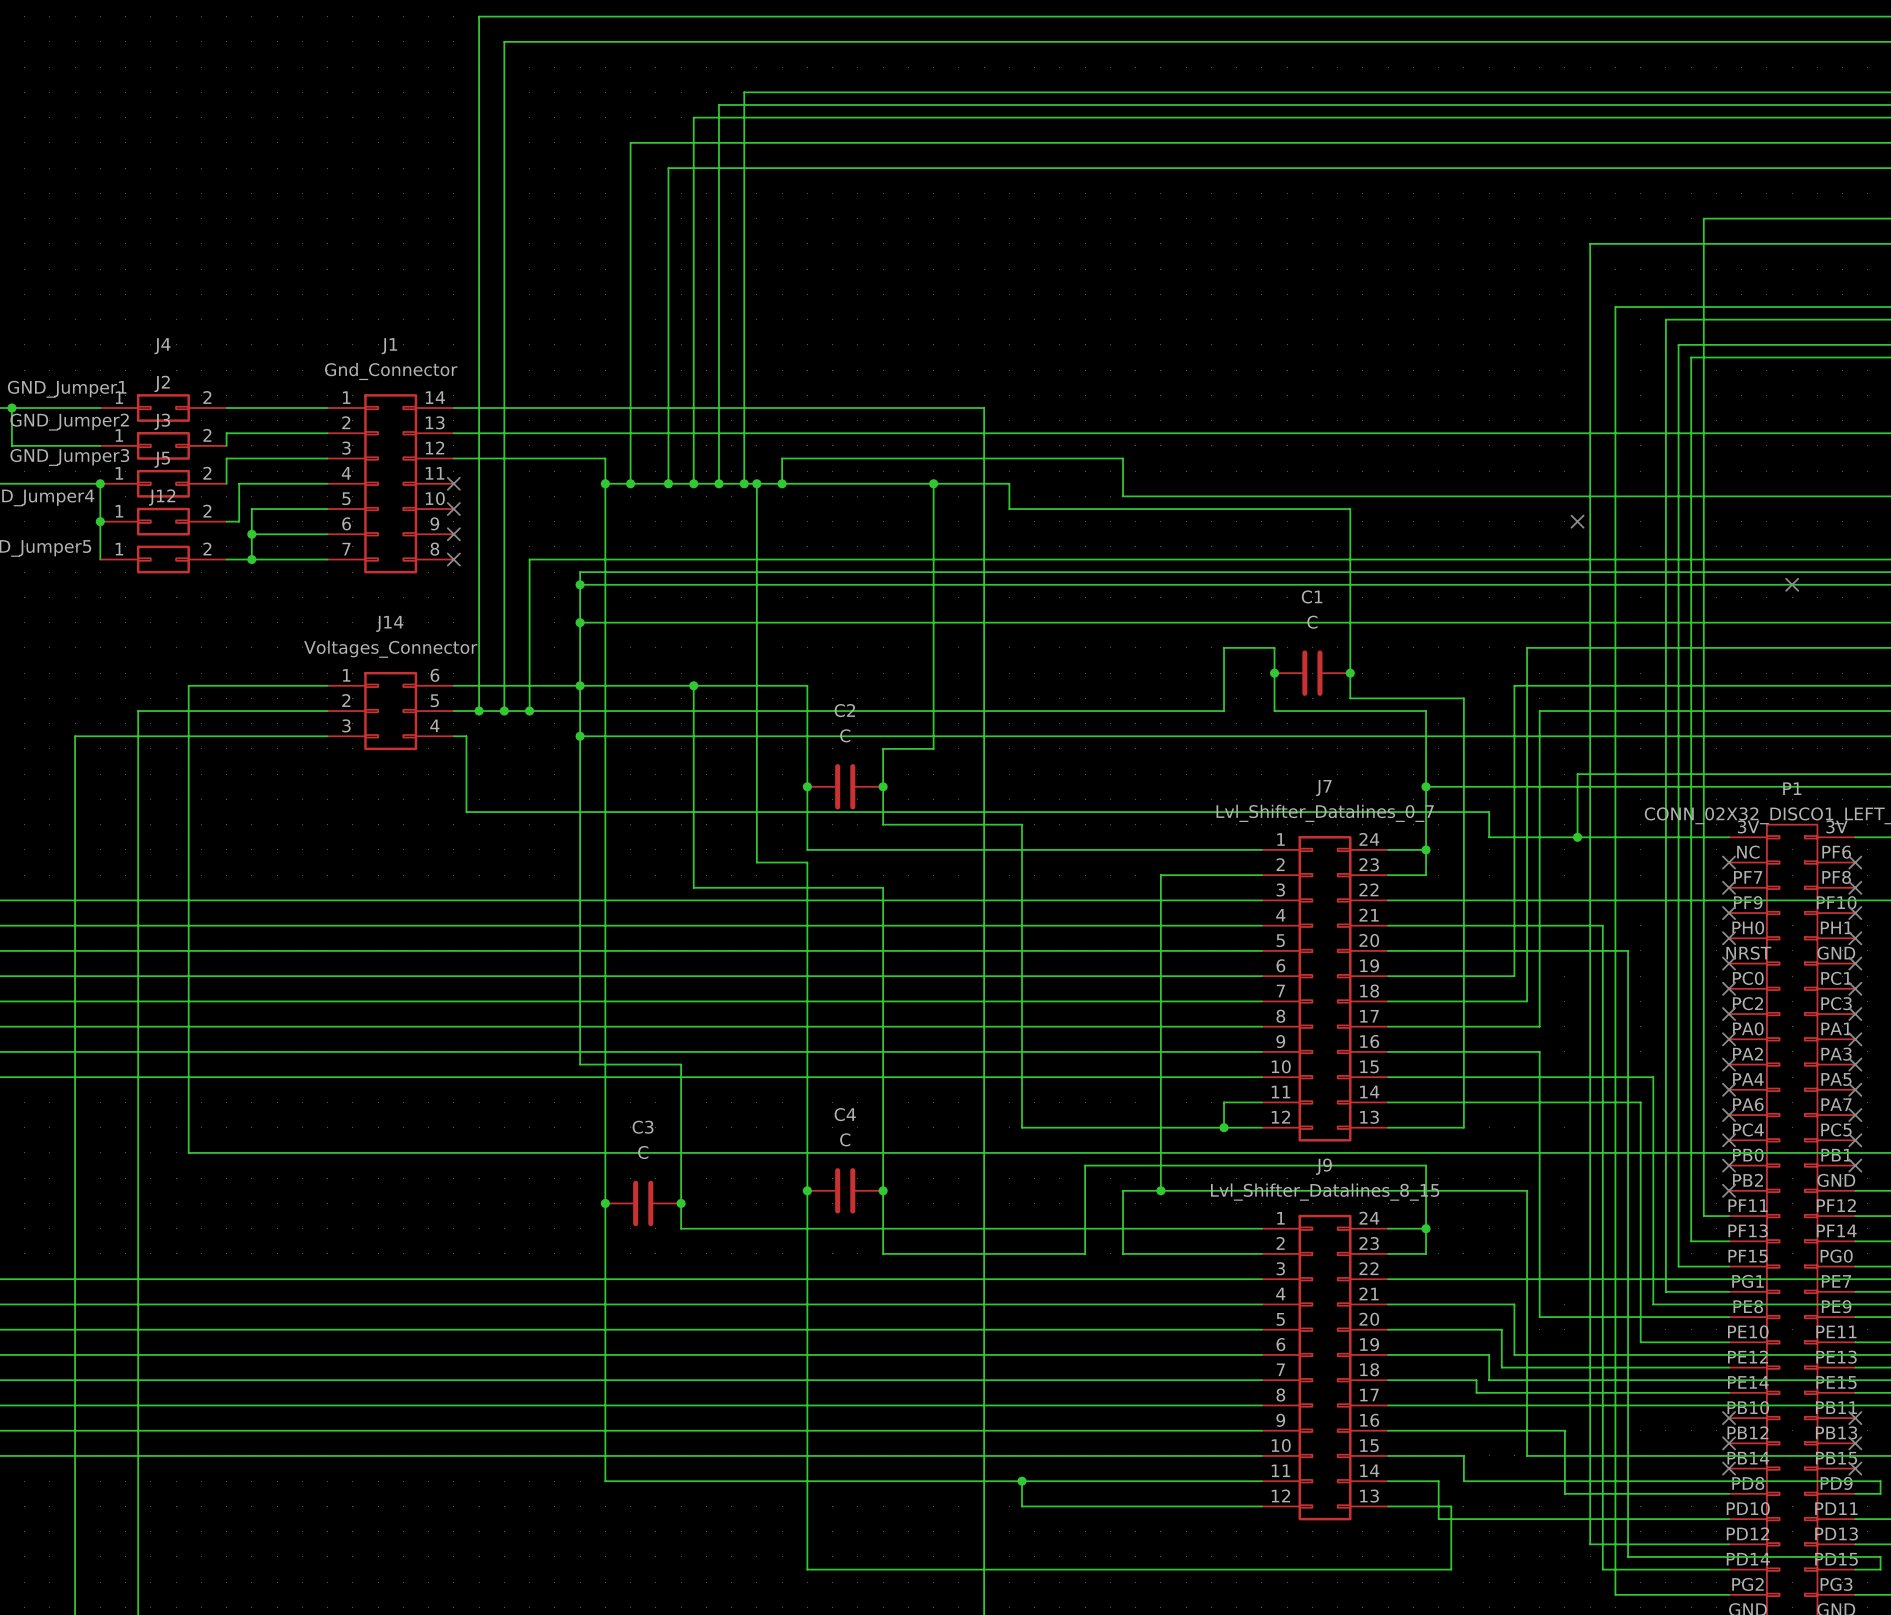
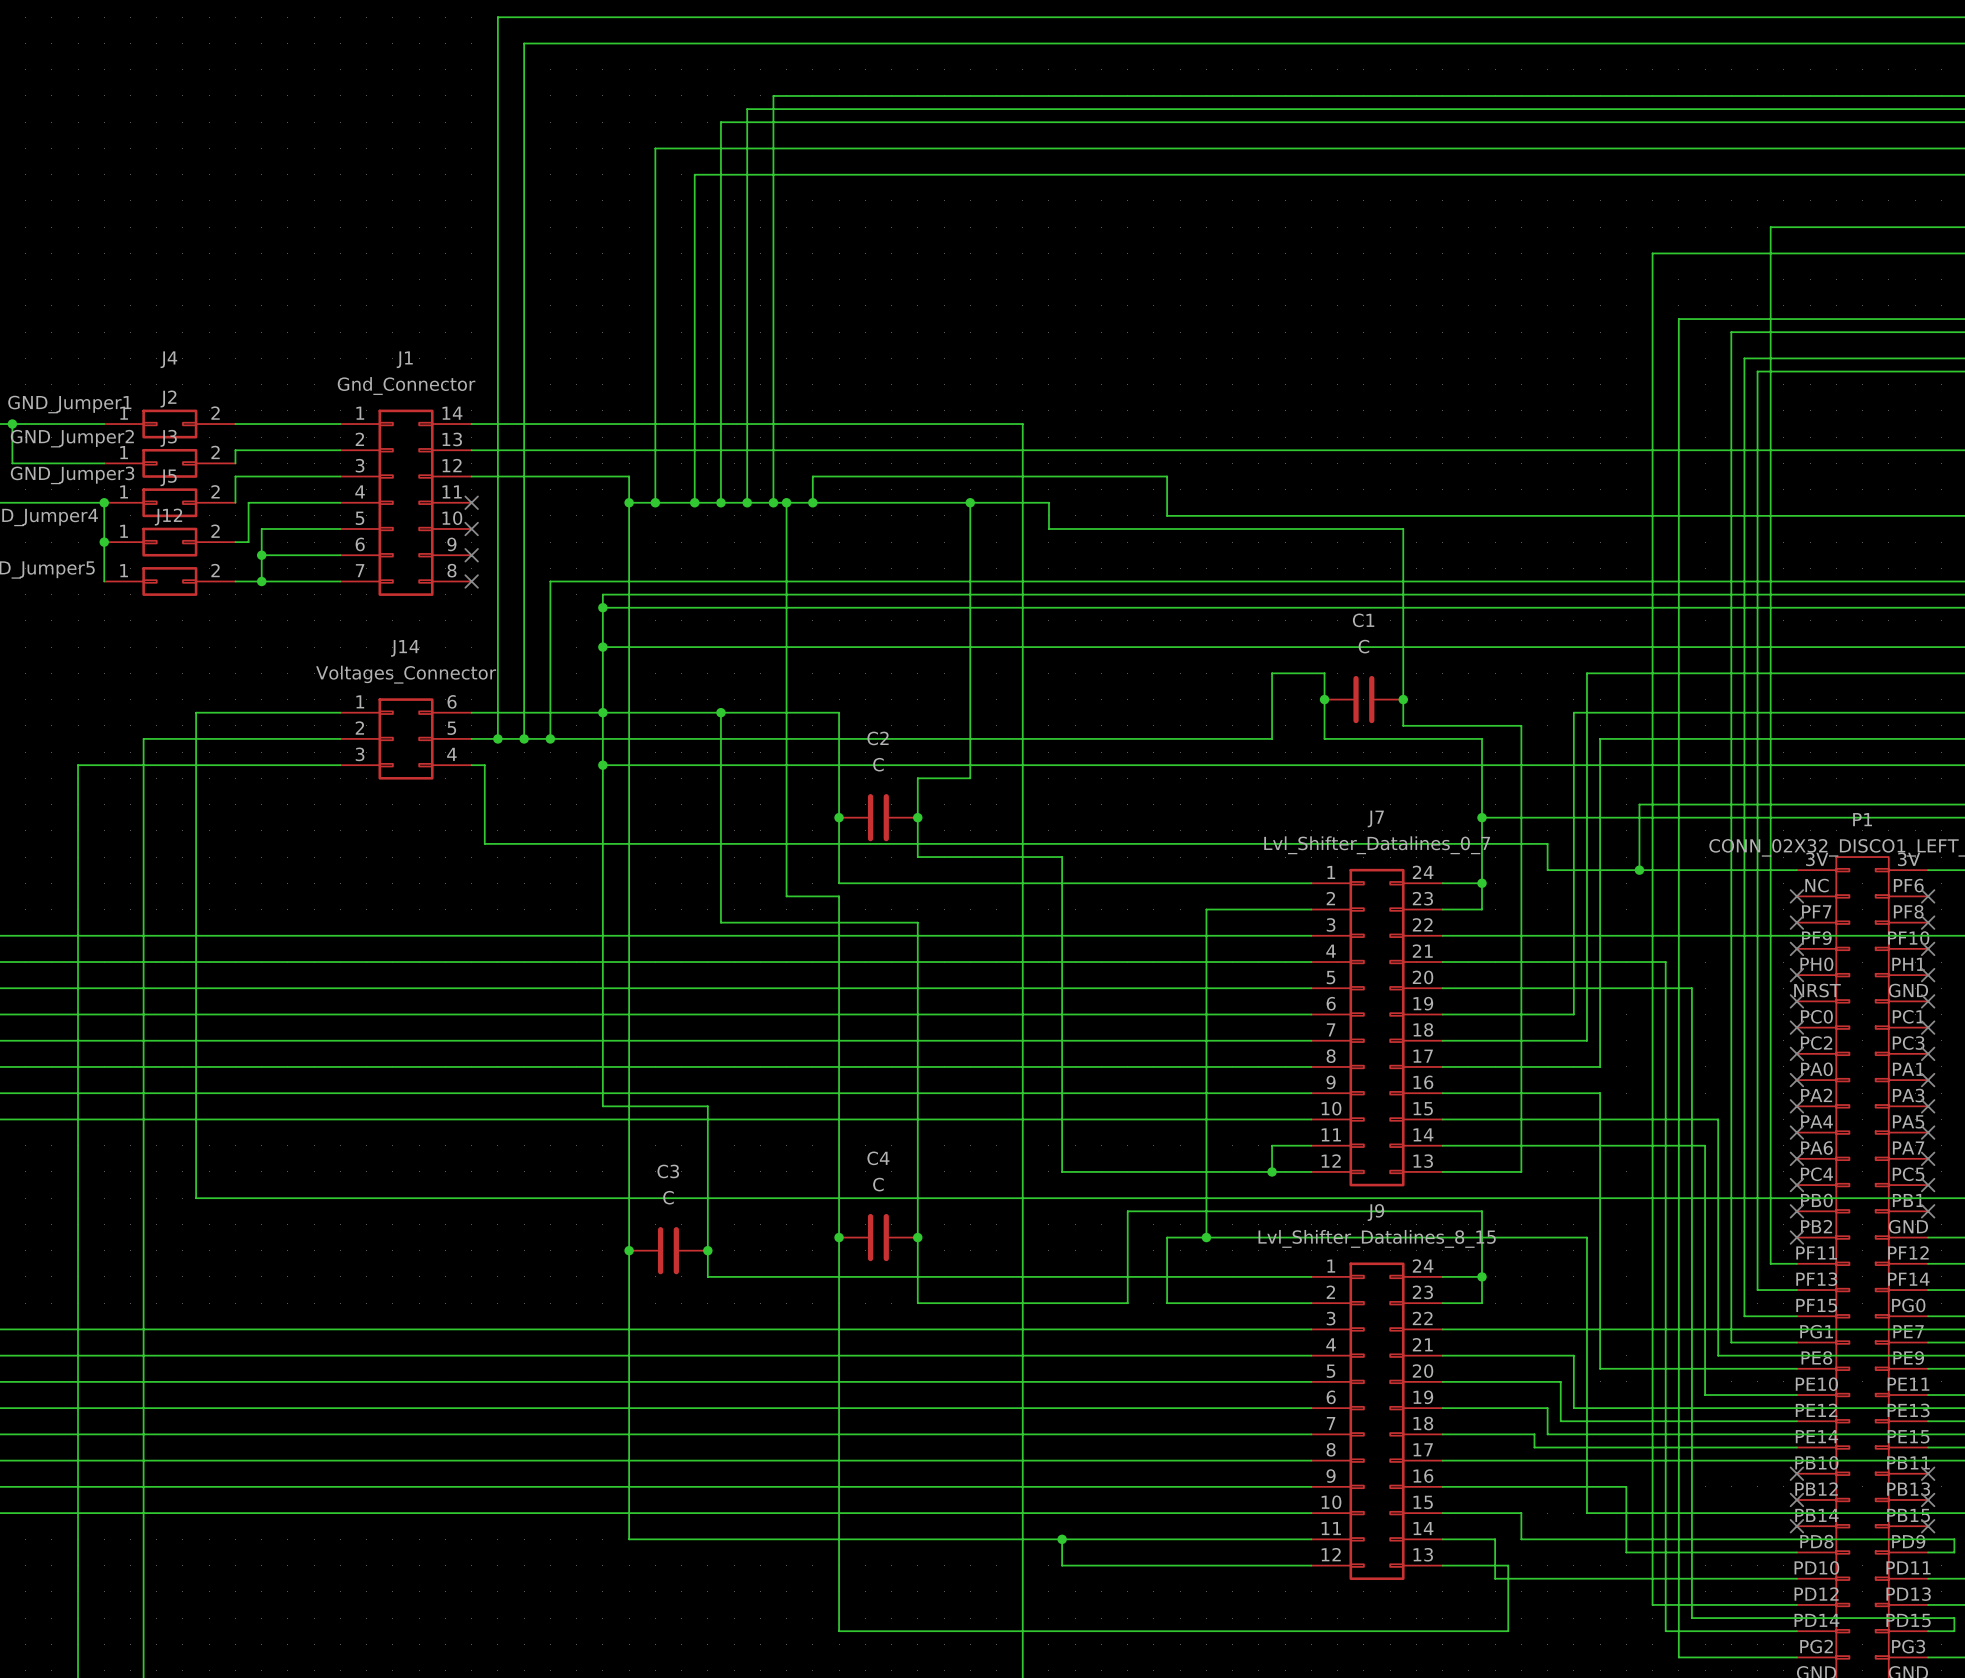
no-connect mark: (1577, 521) -> none
no-connect mark: (1792, 584) -> none

